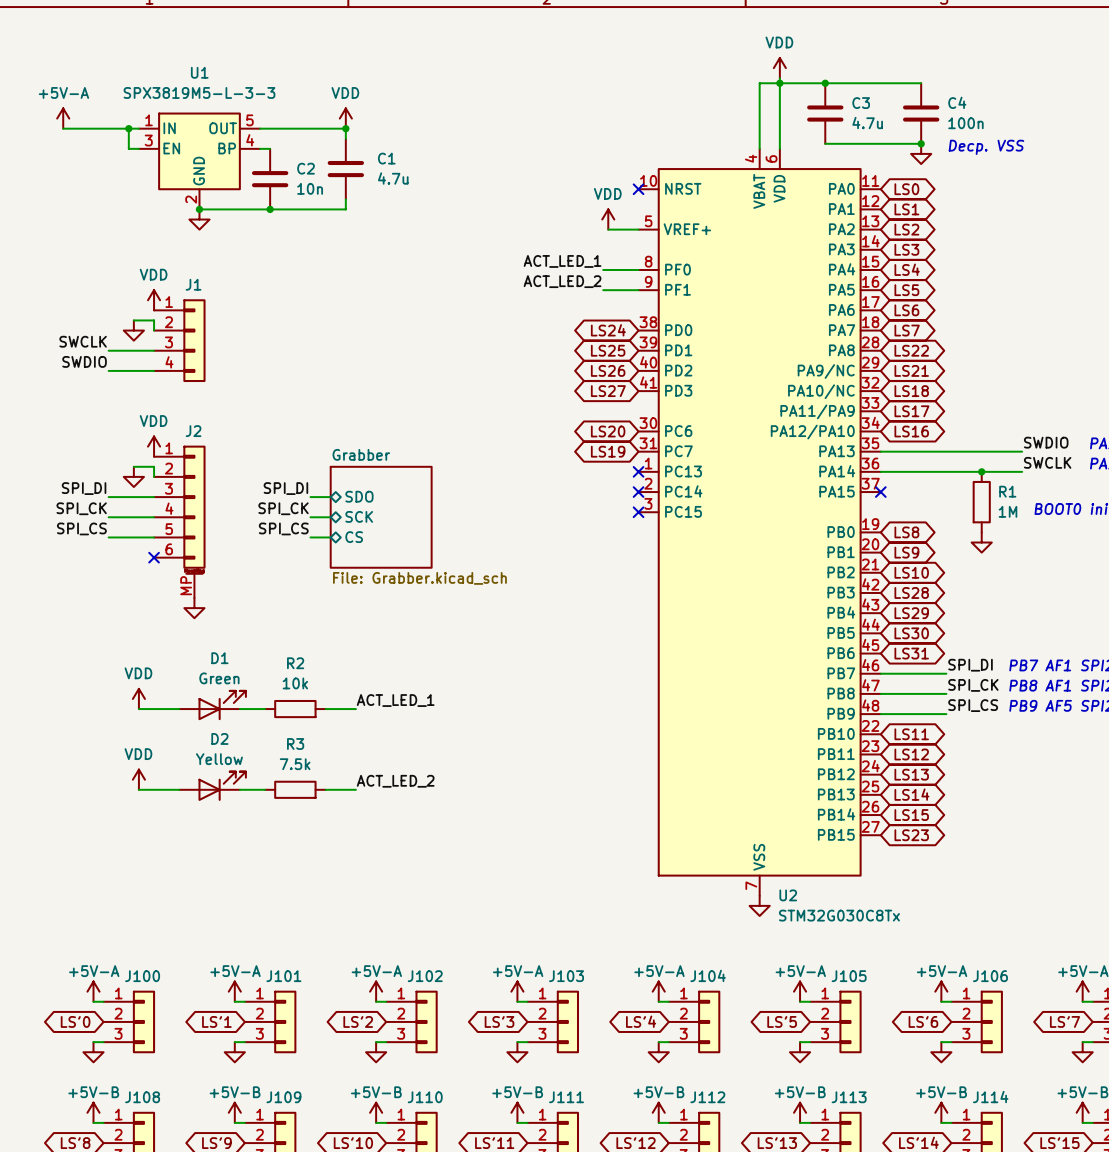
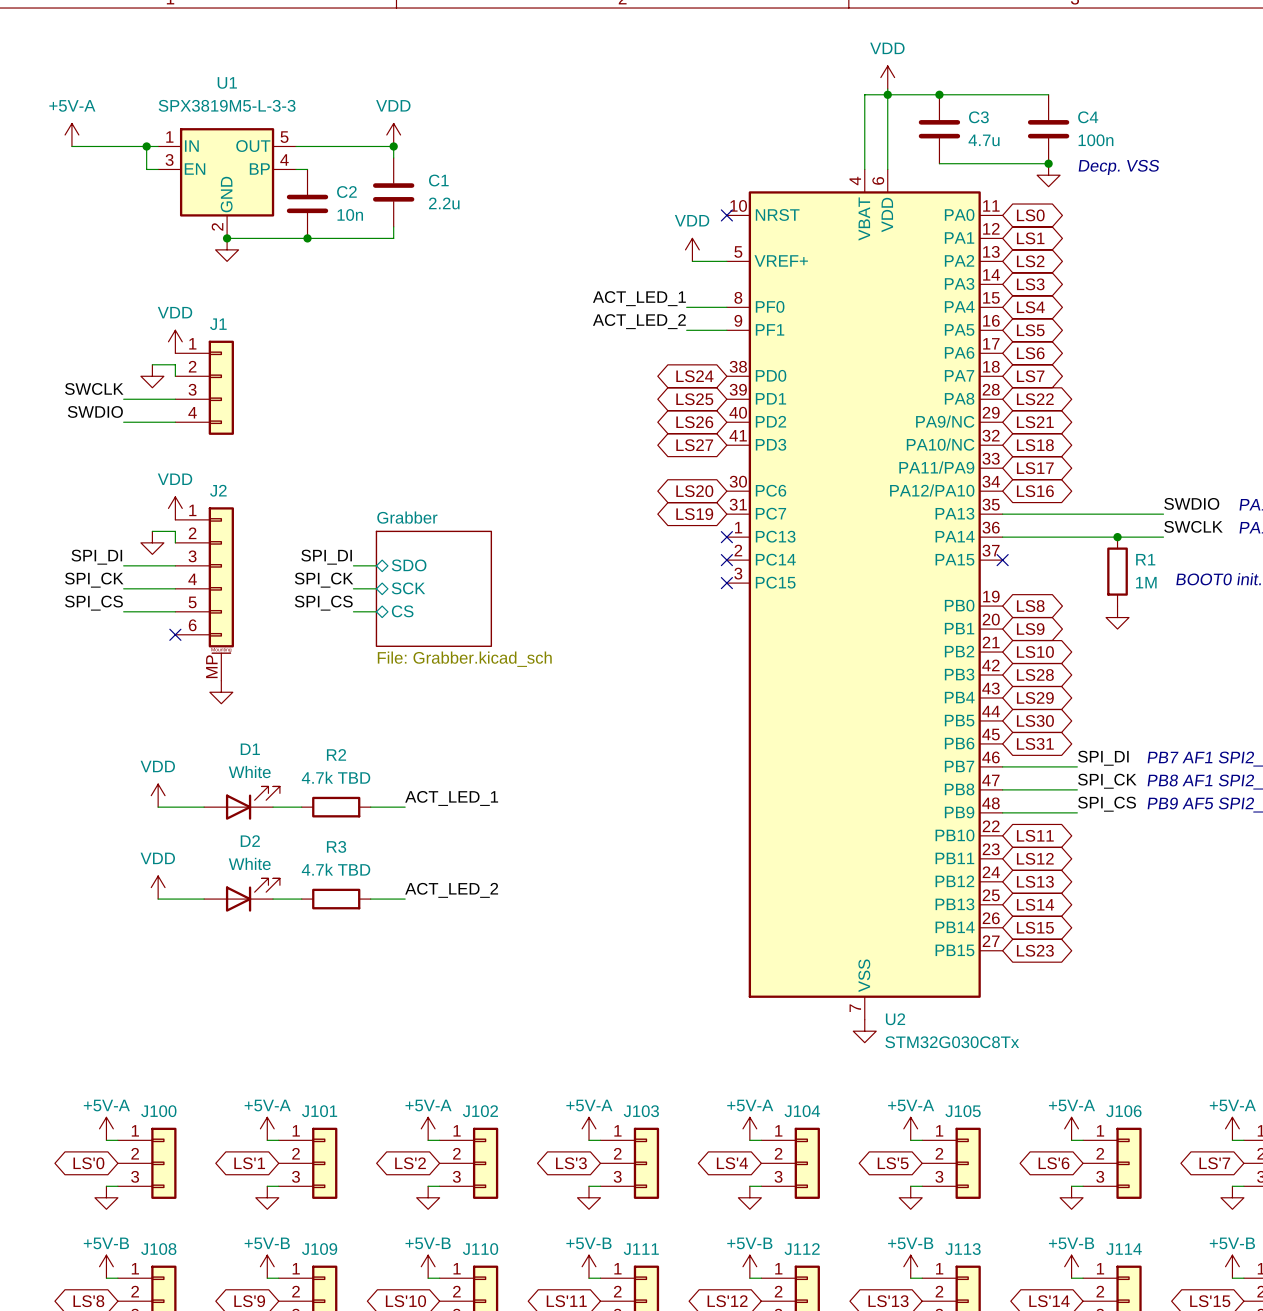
C1 value: 4.7u (393, 178) -> 2.2u (444, 203)
D1 value: Green (219, 678) -> White (249, 772)
R2 value: 10k (295, 683) -> 4.7k TBD (336, 777)
D2 value: Yellow (219, 759) -> White (249, 863)
R3 value: 7.5k (295, 764) -> 4.7k TBD (336, 869)

